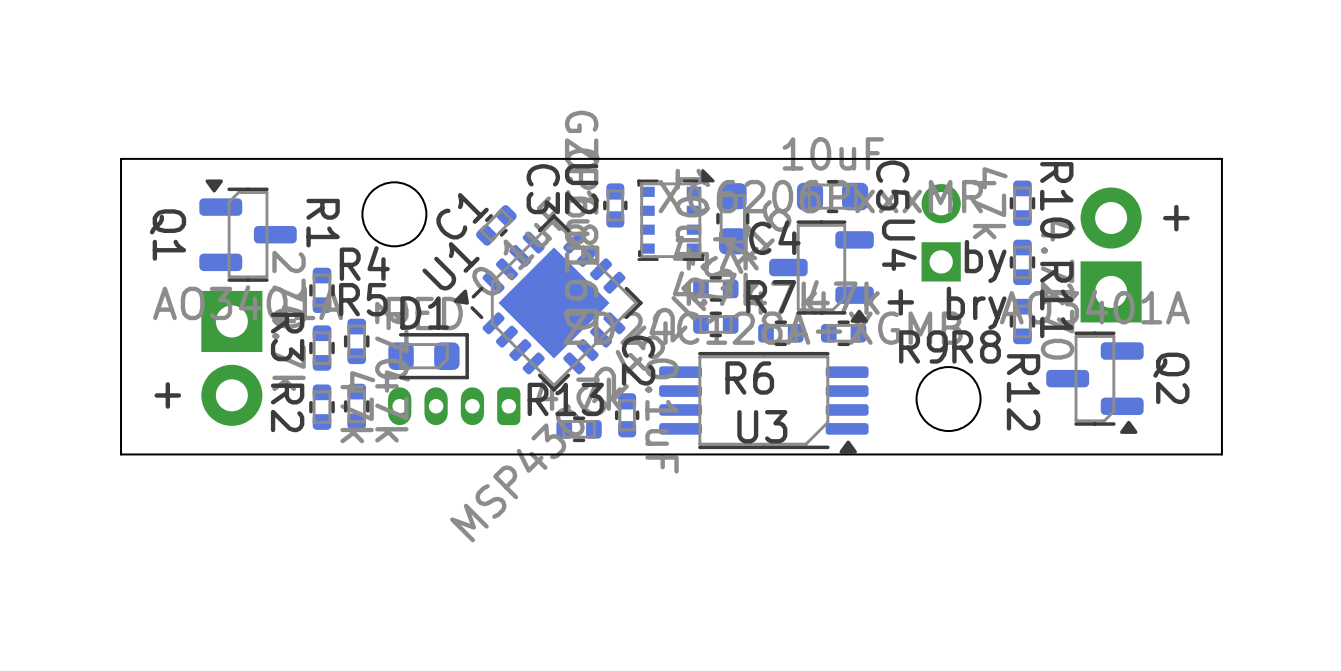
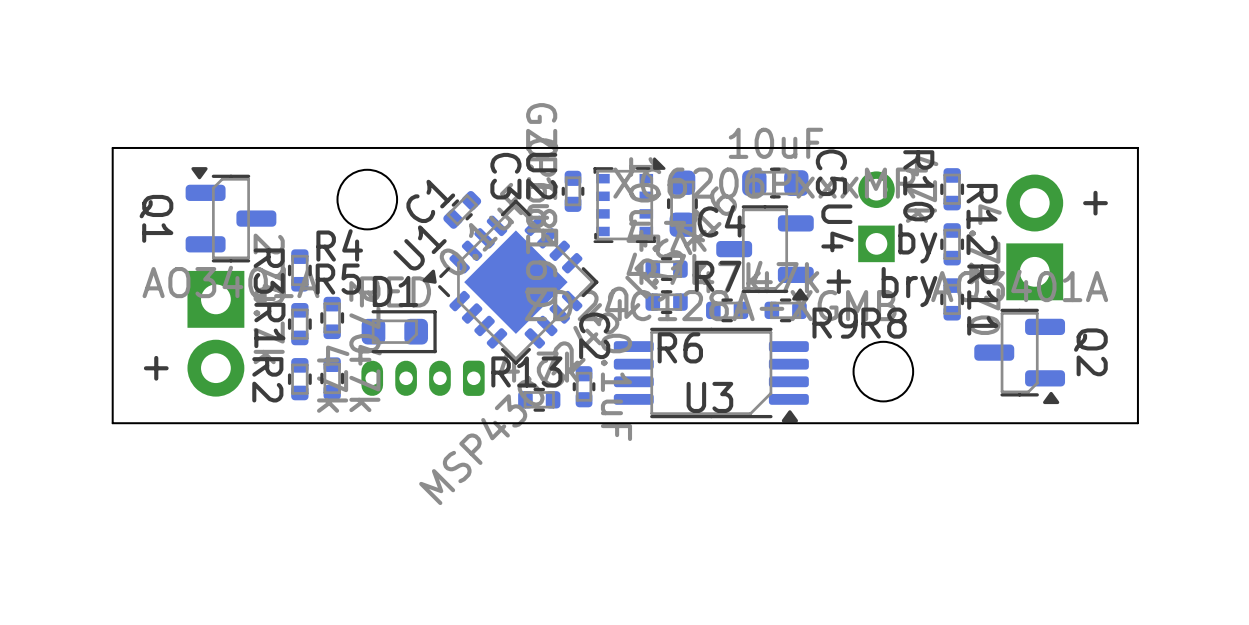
R10 name position: R10 (1056, 200) -> R10 (918, 185)
R1 name: R1 (323, 223) -> R3 (269, 271)
R11 name: R11 (1056, 299) -> R12 (982, 219)
R3 name: R3 (287, 336) -> R1 (269, 325)
R9 name position: R9 (923, 346) -> R9 (835, 323)
R8 name position: R8 (976, 346) -> R8 (884, 323)
R6 name position: R6 (749, 378) -> R6 (680, 347)
R12 name: R12 (1023, 392) -> R11 (982, 300)

